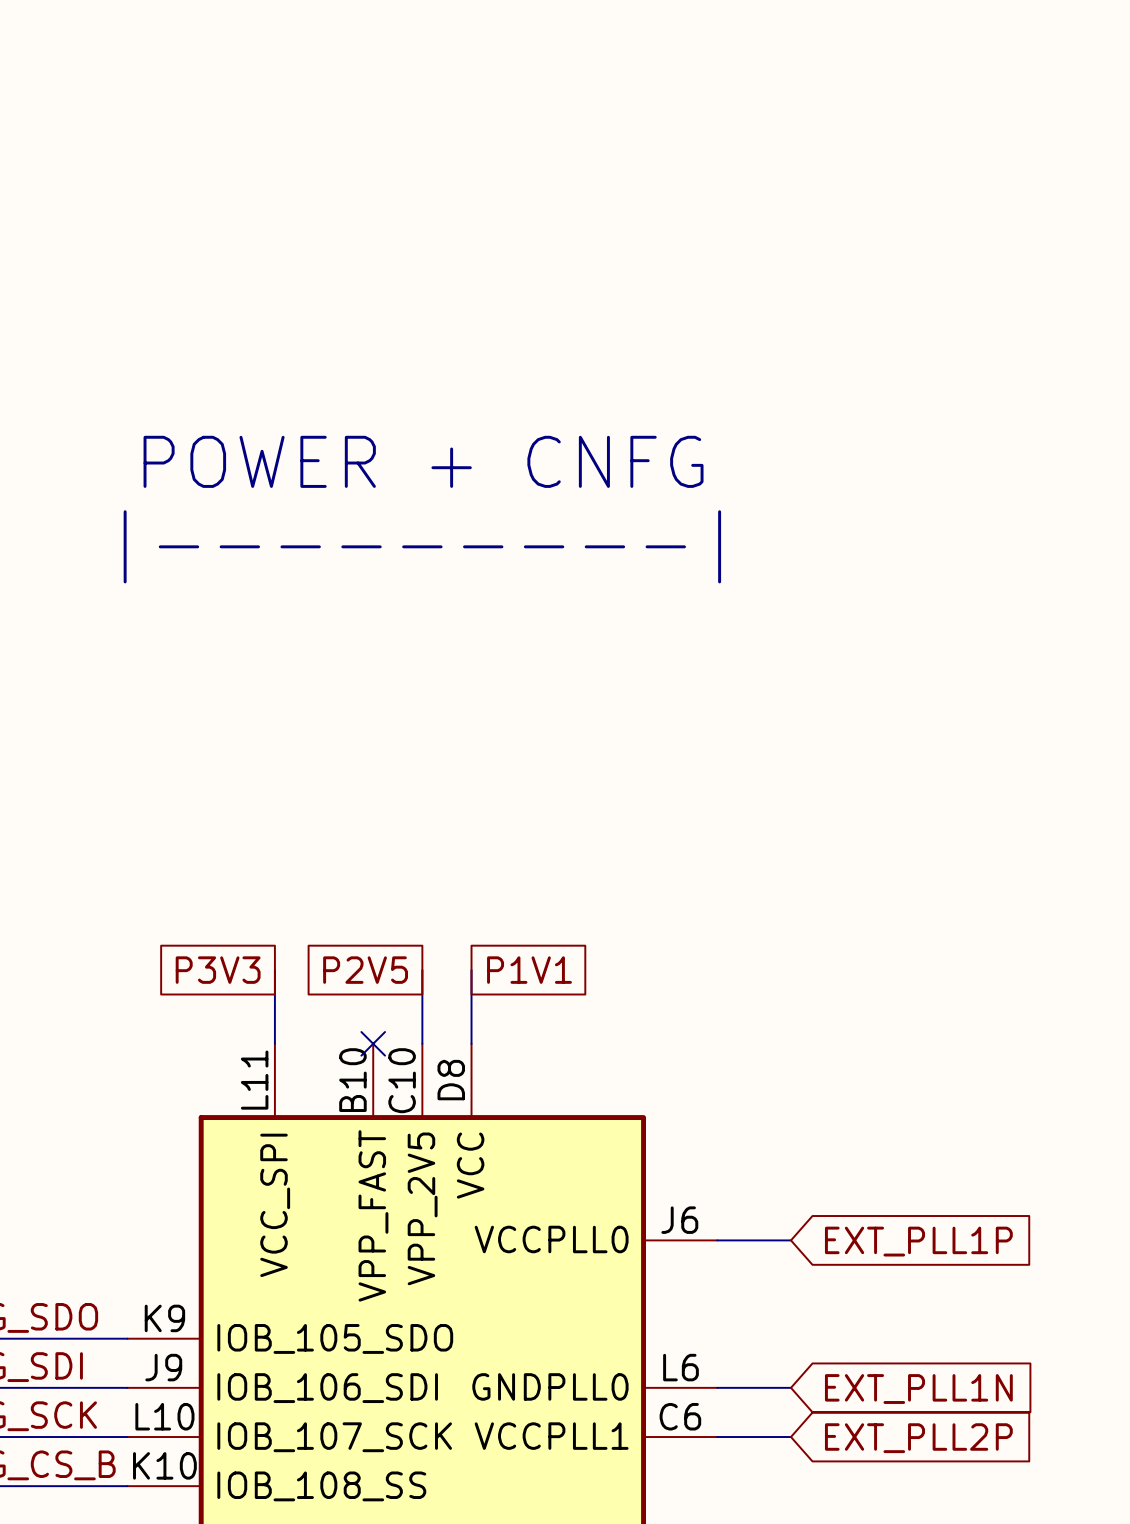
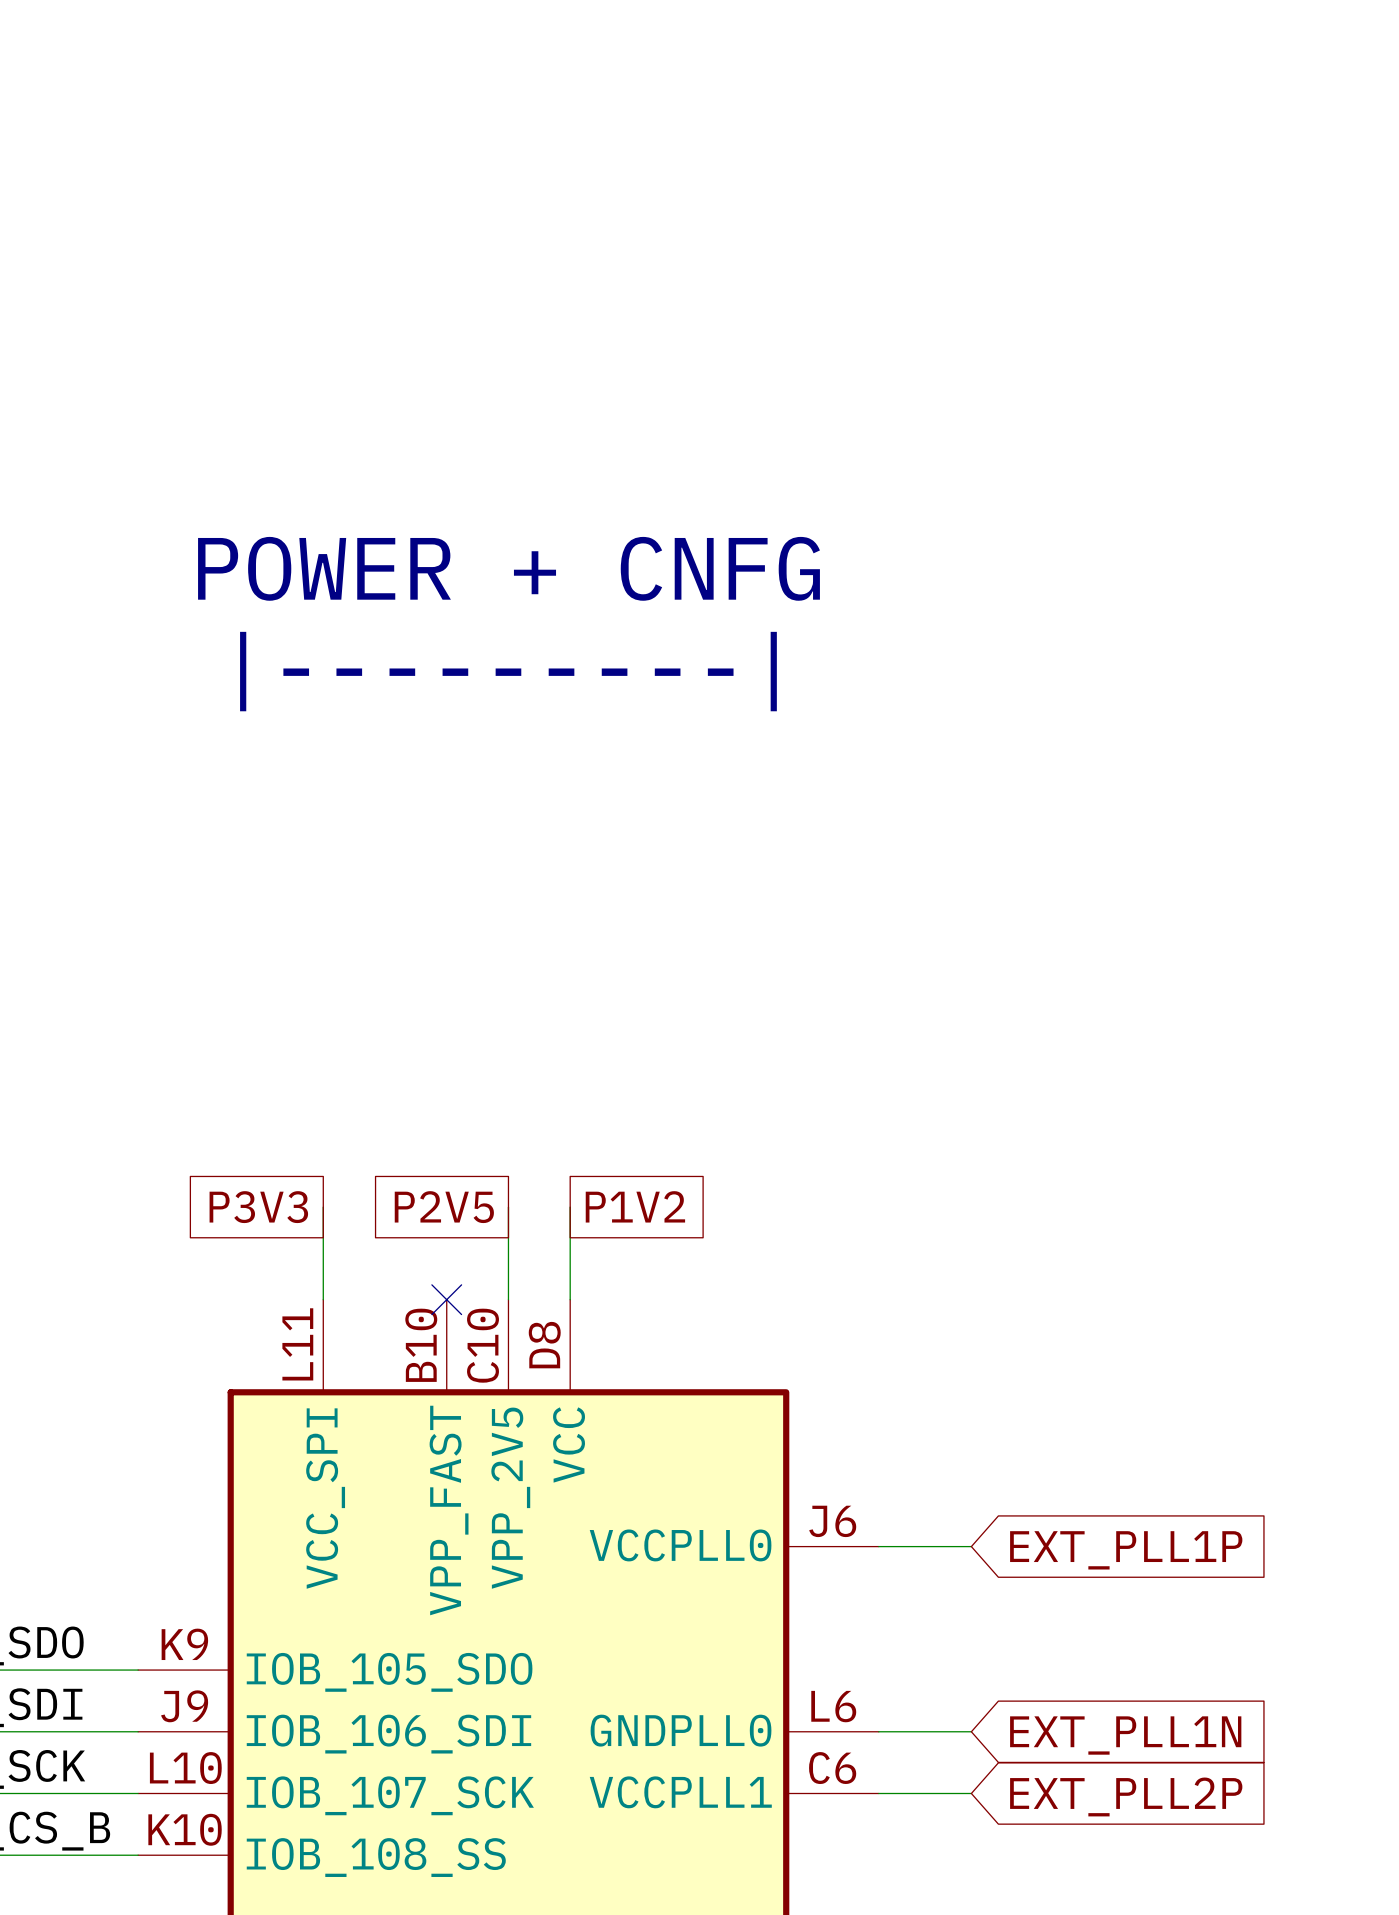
global label: P1V1 (529, 970) -> P1V2 (635, 1206)

